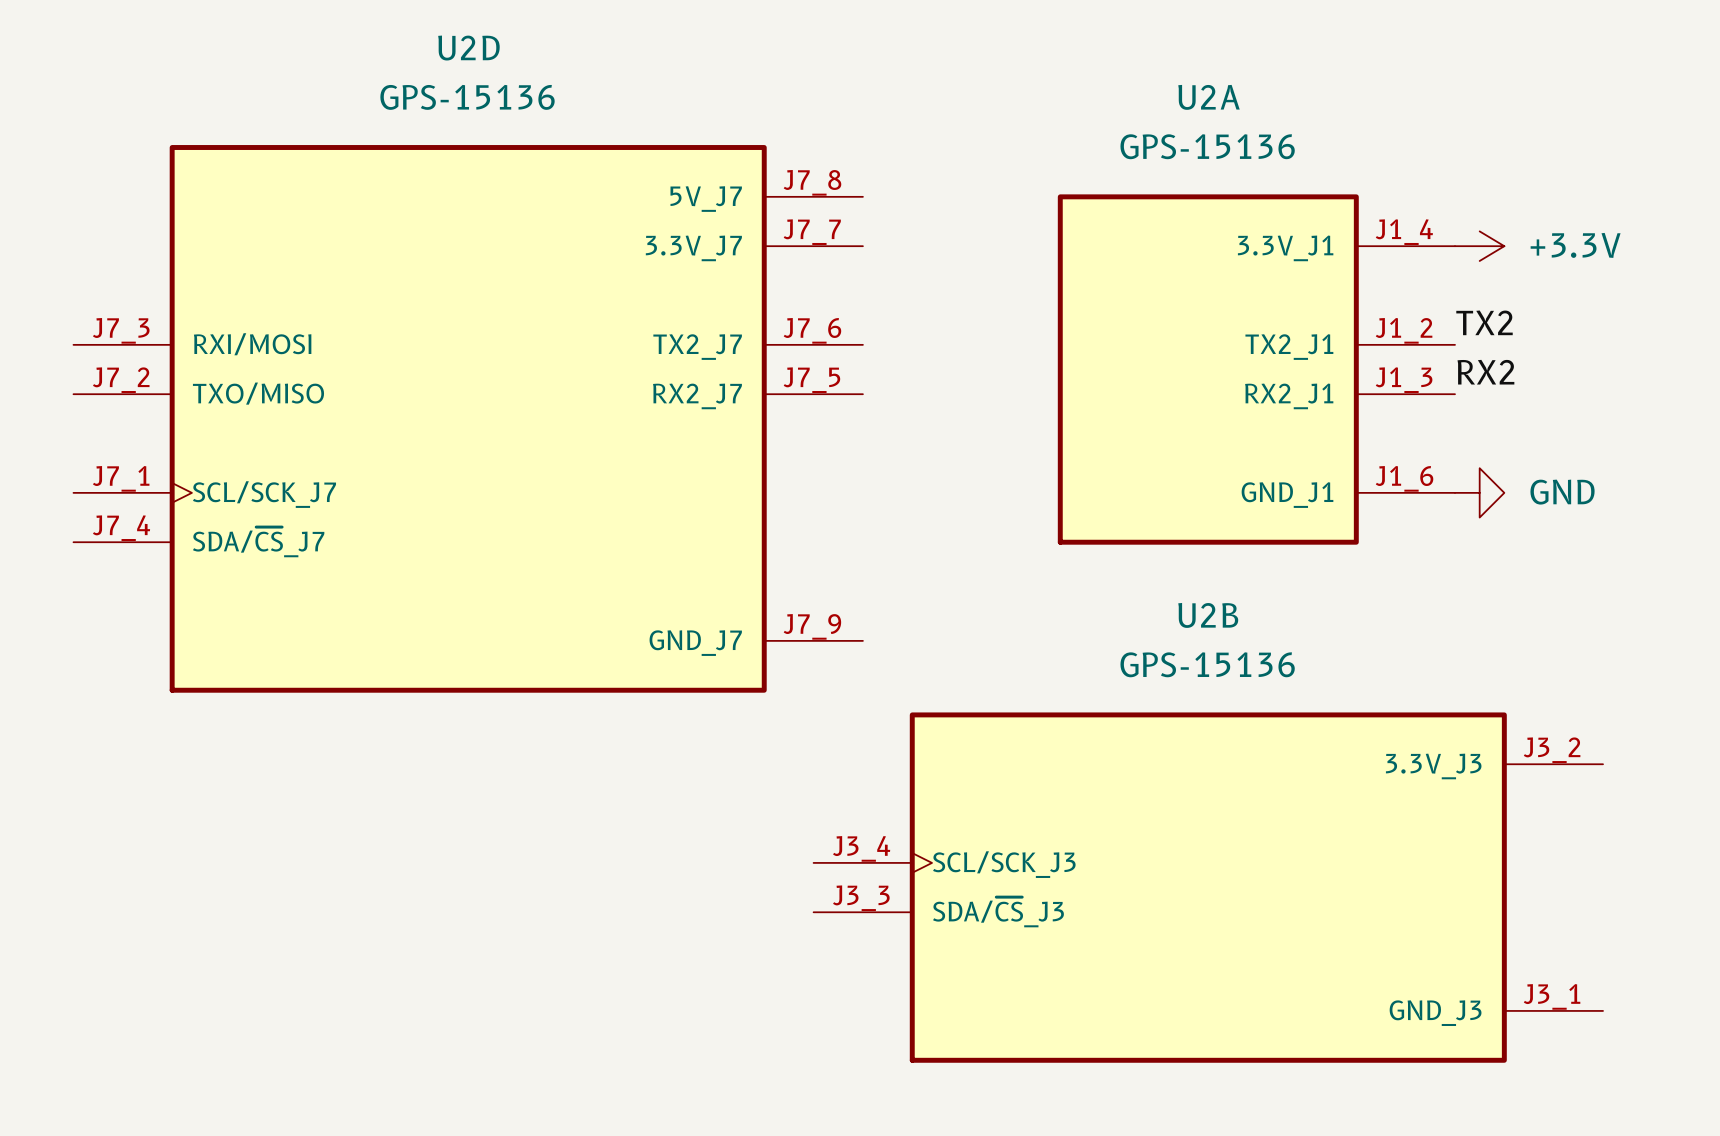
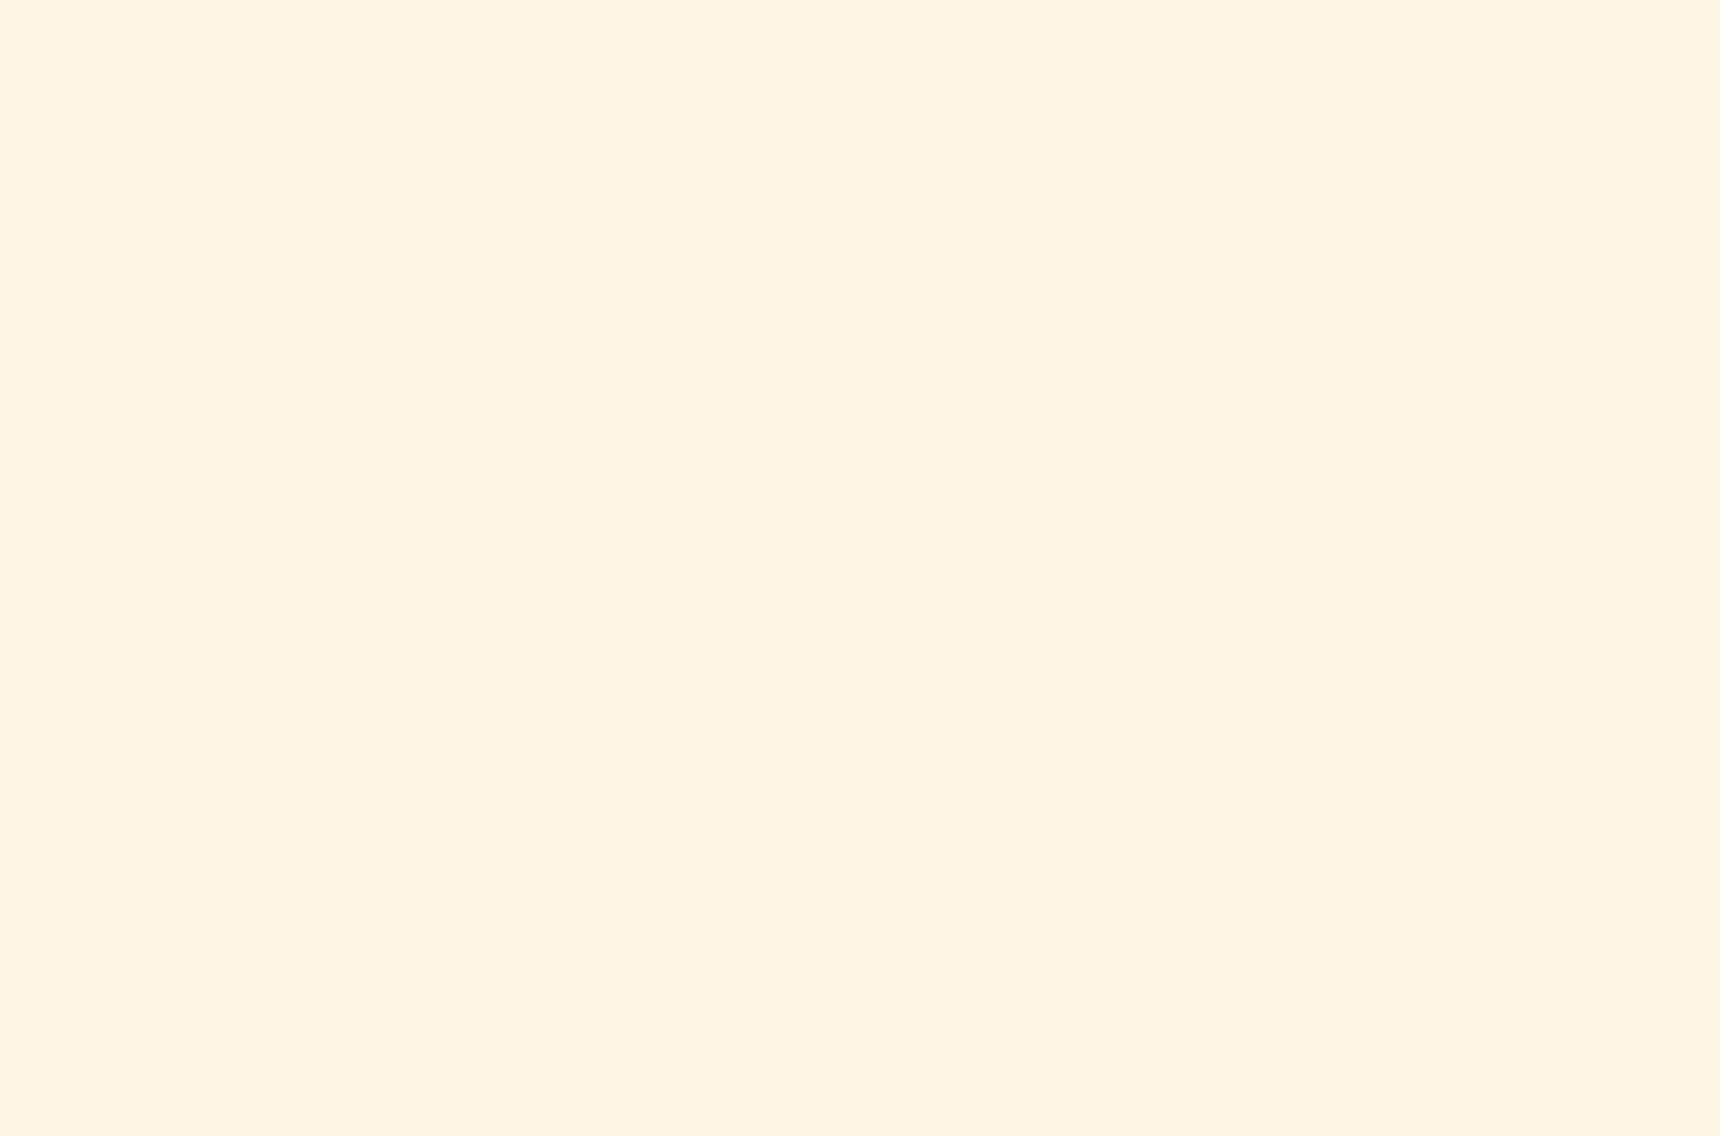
power symbol: +3.3V (1479, 246) -> none
label: TX2 (1484, 322) -> none
U2A: GPS-15136 (1256, 369) -> none
label: RX2 (1485, 372) -> none
U2D: GPS-15136 (468, 418) -> none
power symbol: GND (1479, 492) -> none
U2B: GPS-15136 (1208, 887) -> none

